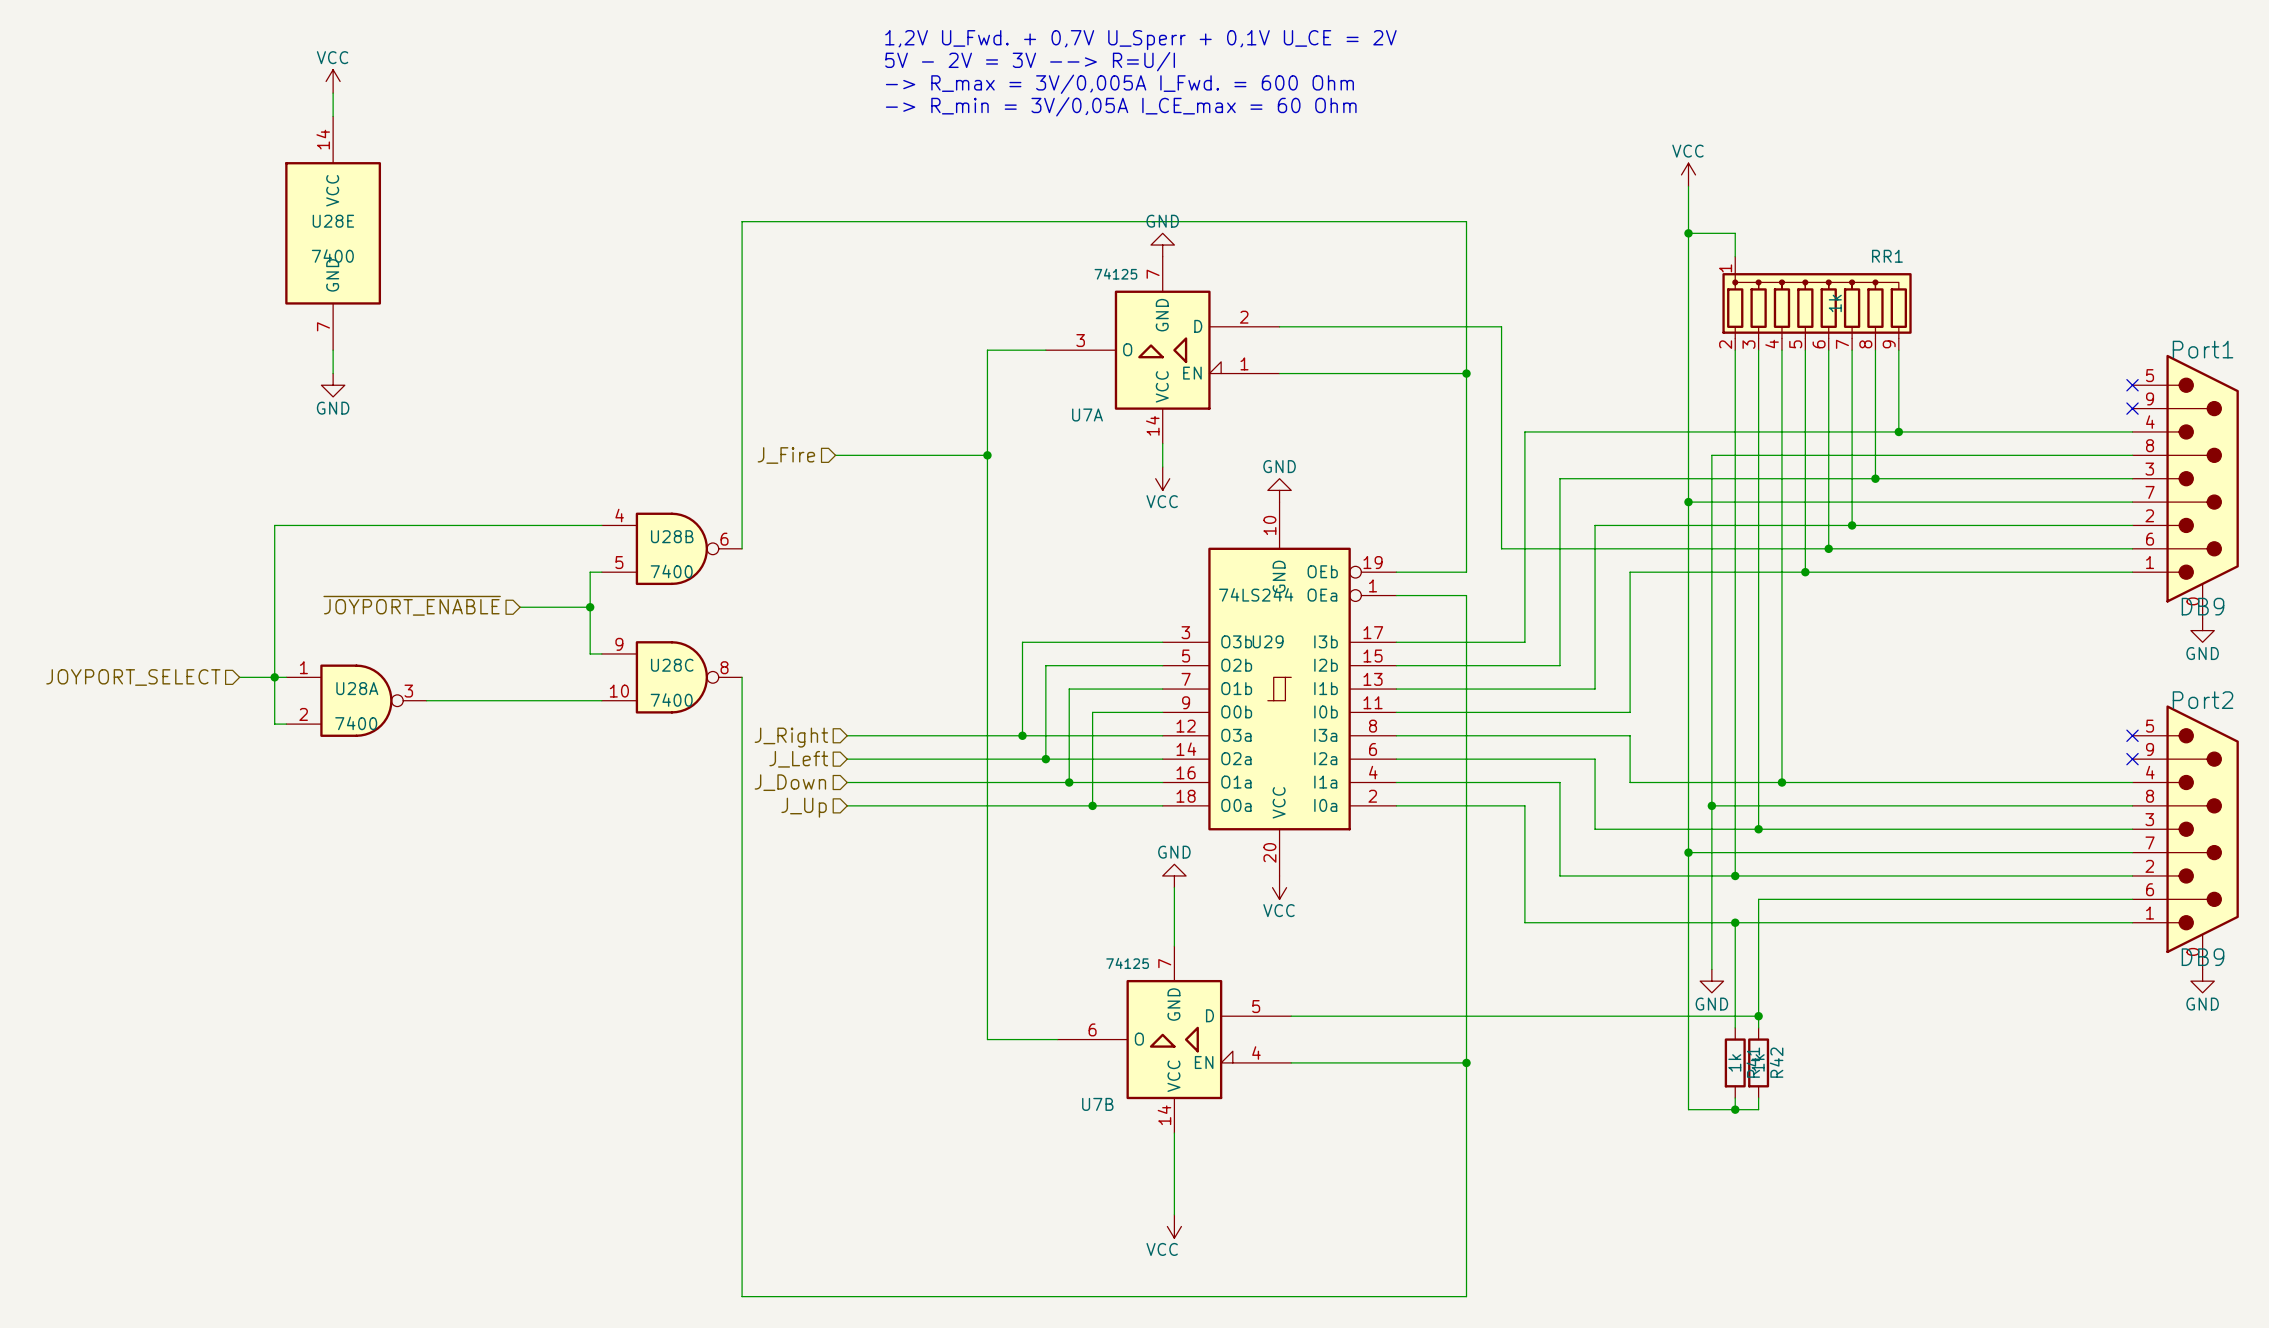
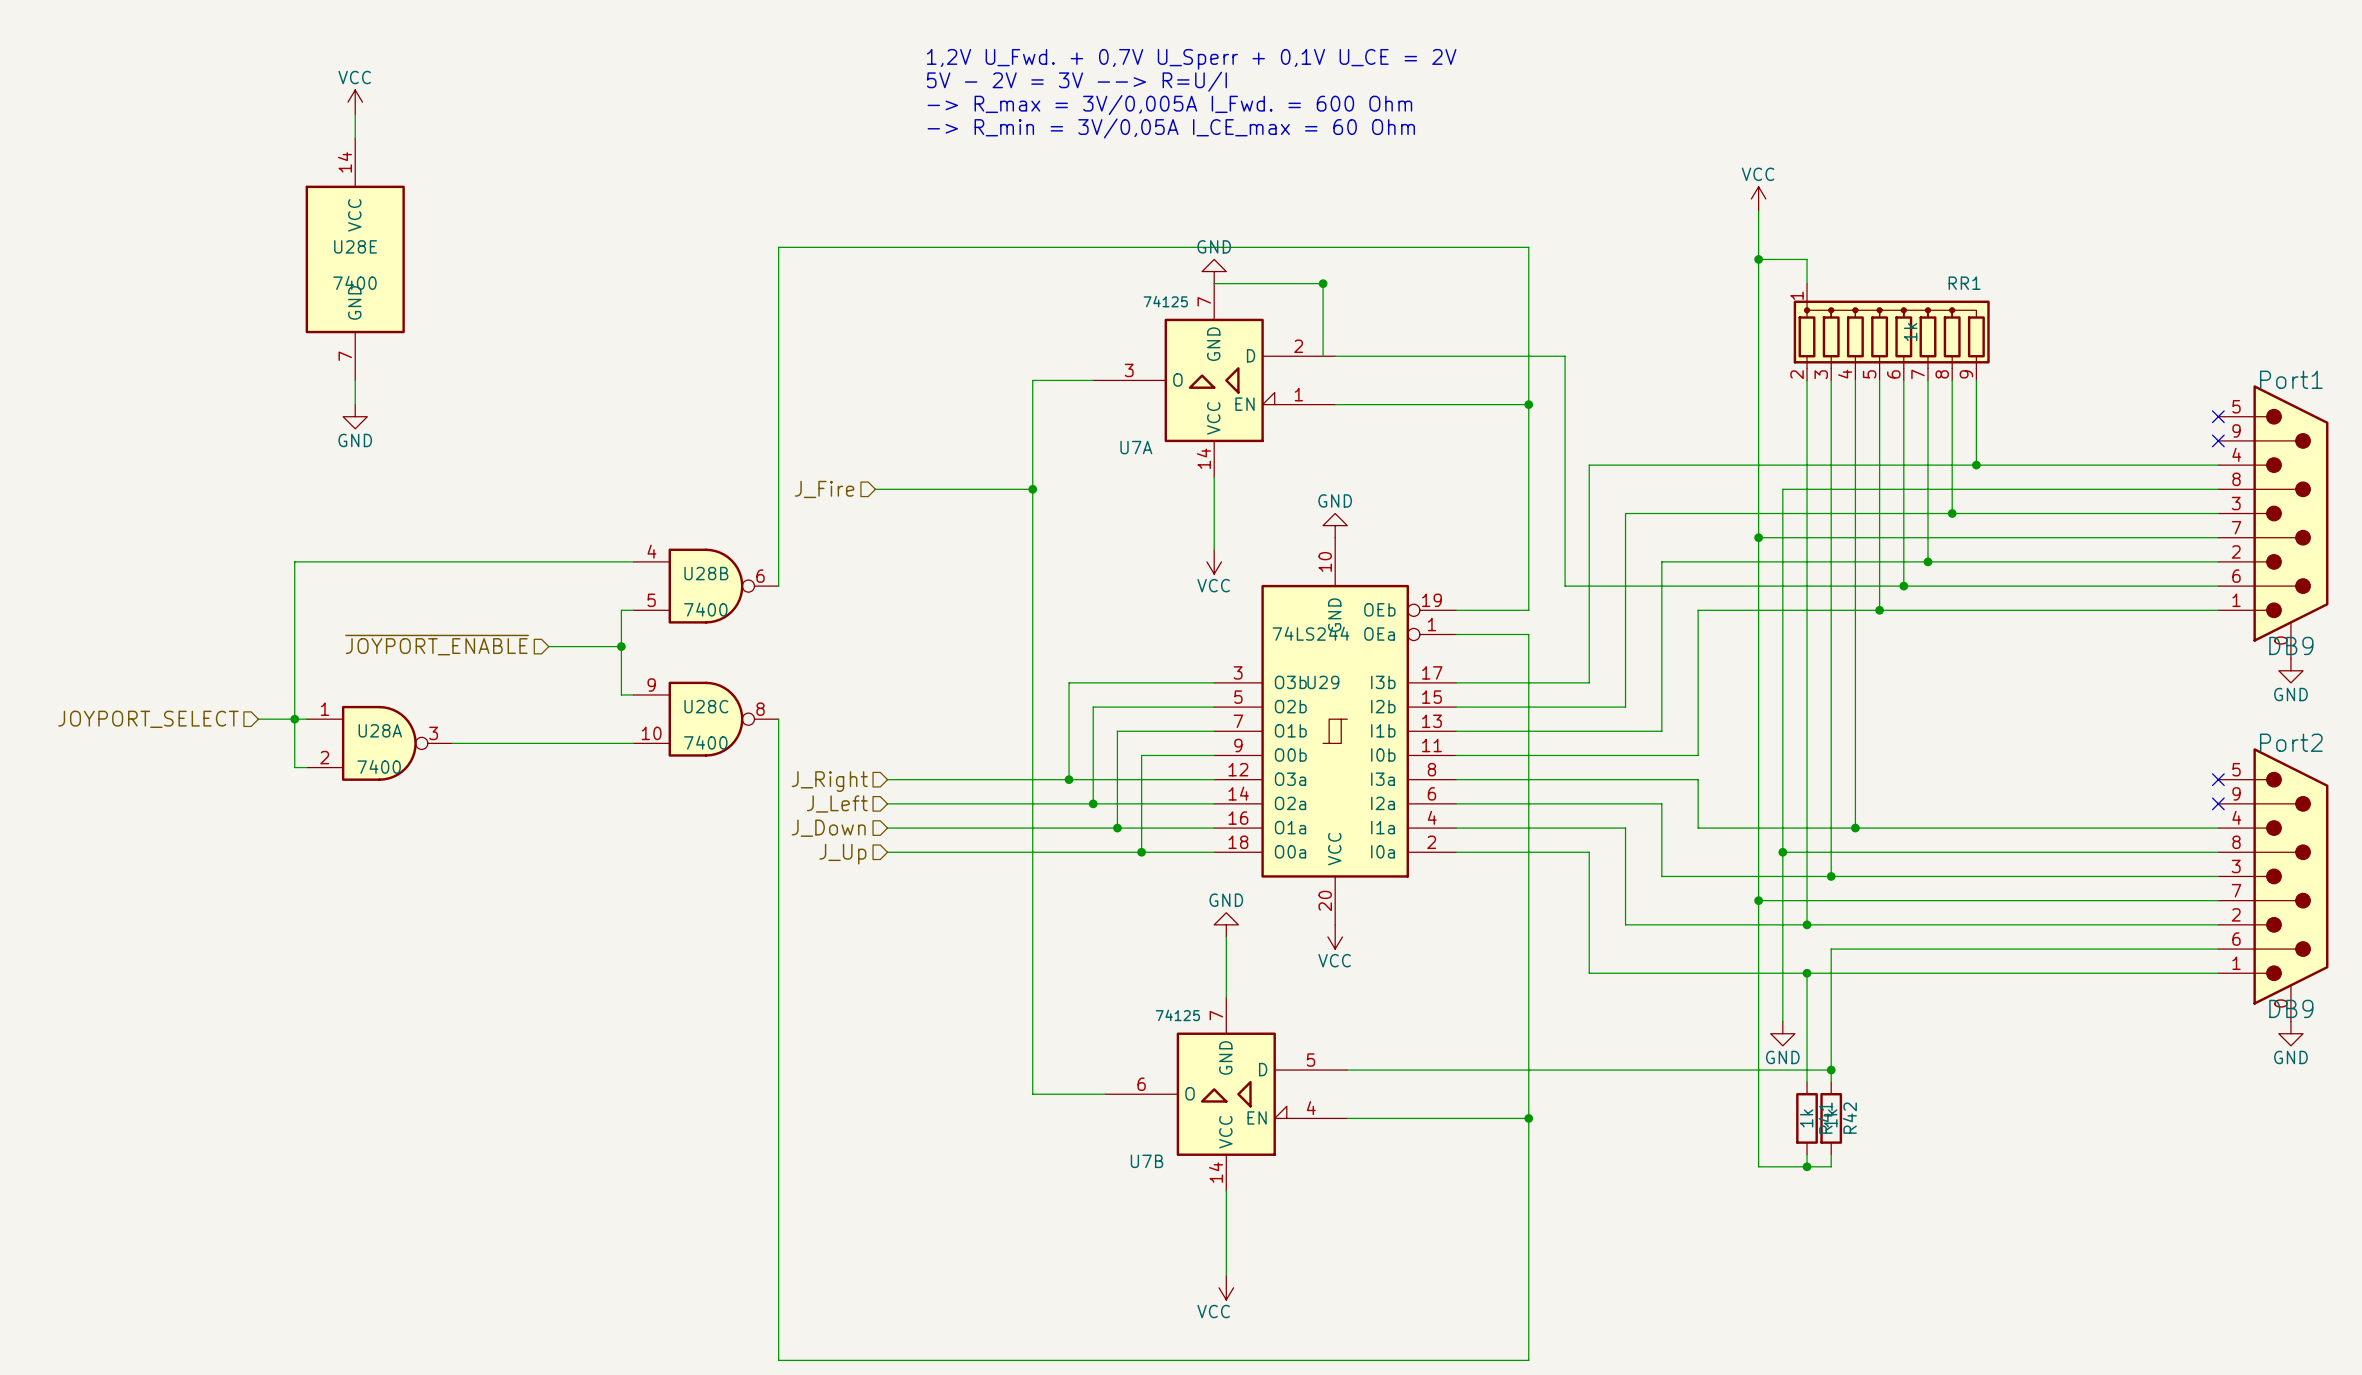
wire: none -> (1214, 283) (1323, 283) (1323, 356)
junction: none -> (1323, 283)
power symbol position: VCC (1162, 478) -> VCC (1214, 561)

